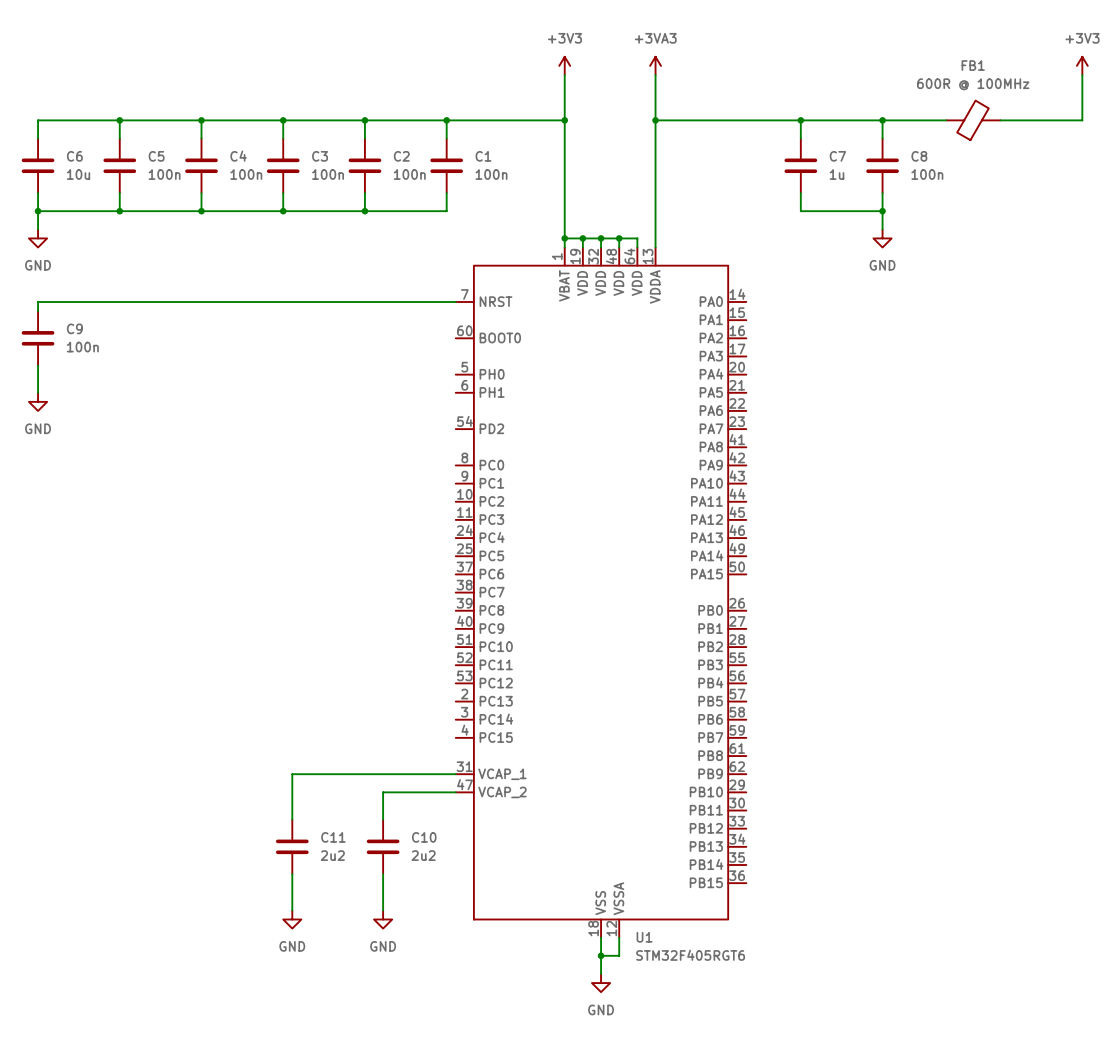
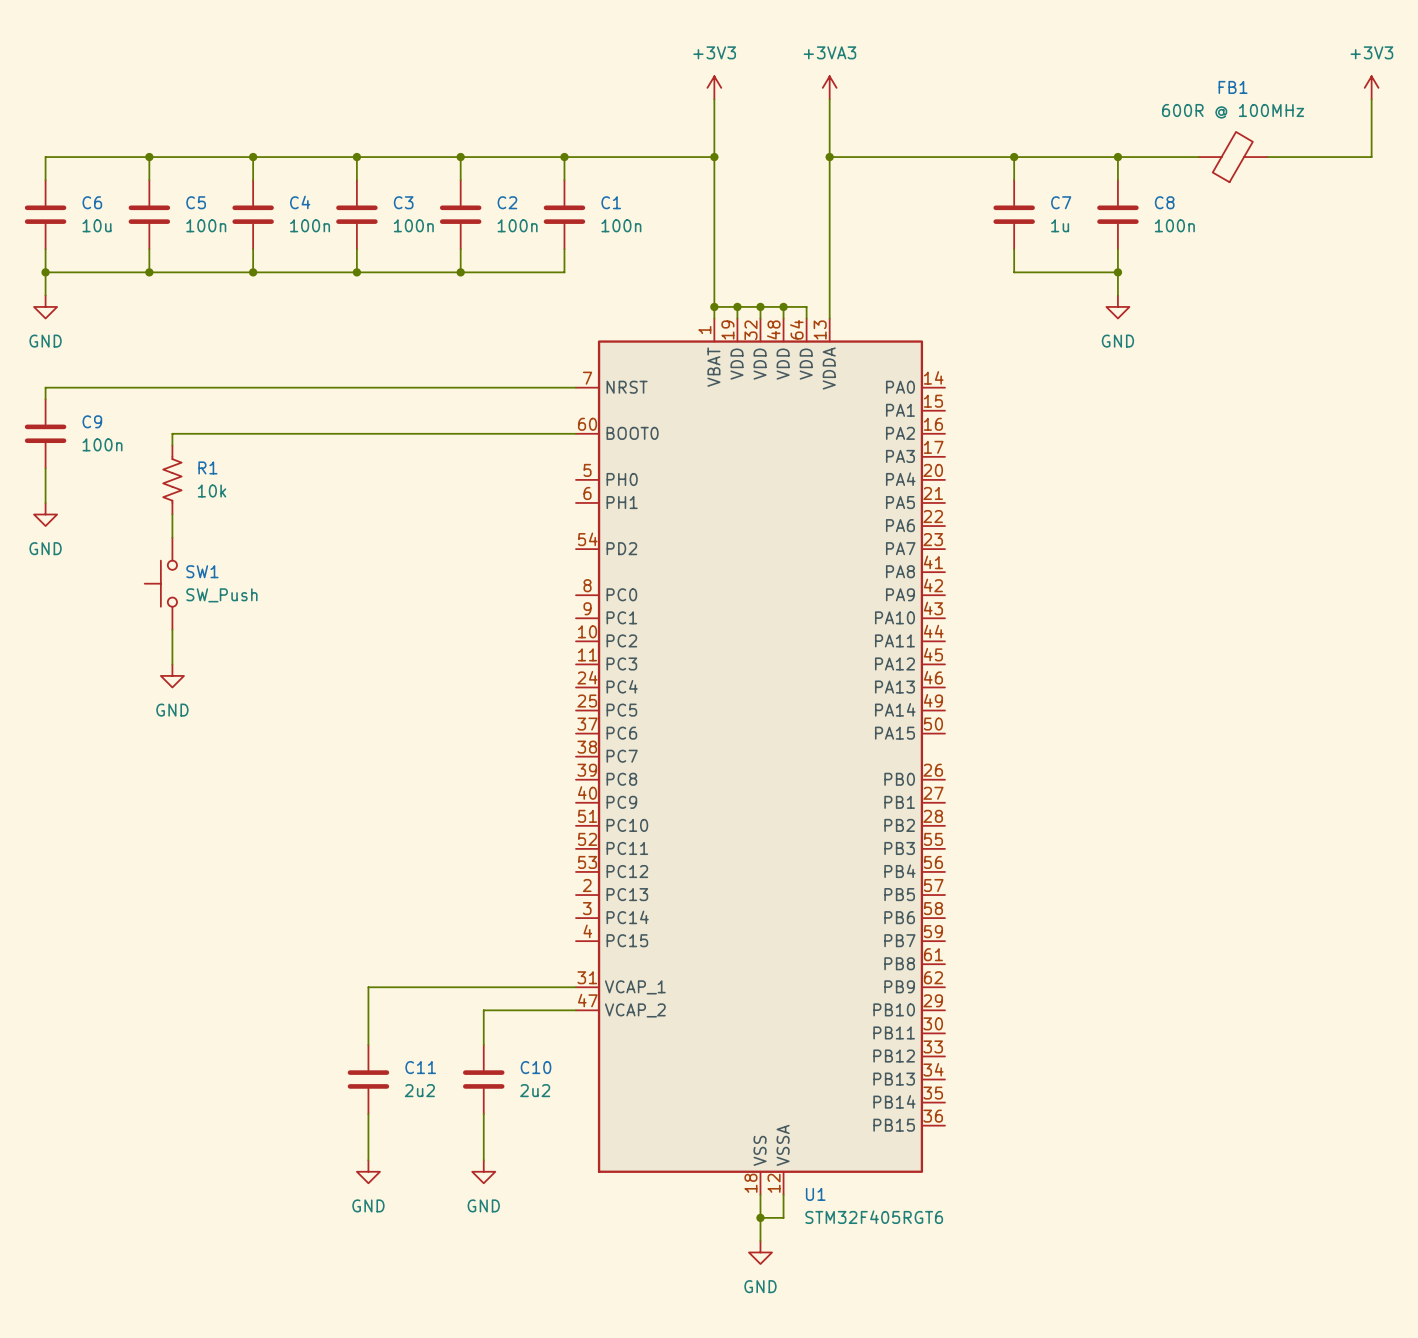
wire: none -> (575, 433) (172, 433) (172, 445)
R1: none -> 10k (172, 479)
wire: none -> (172, 514) (172, 537)
SW1: none -> SW_Push (160, 583)
wire: none -> (172, 629) (172, 664)
power symbol: none -> GND (172, 675)

